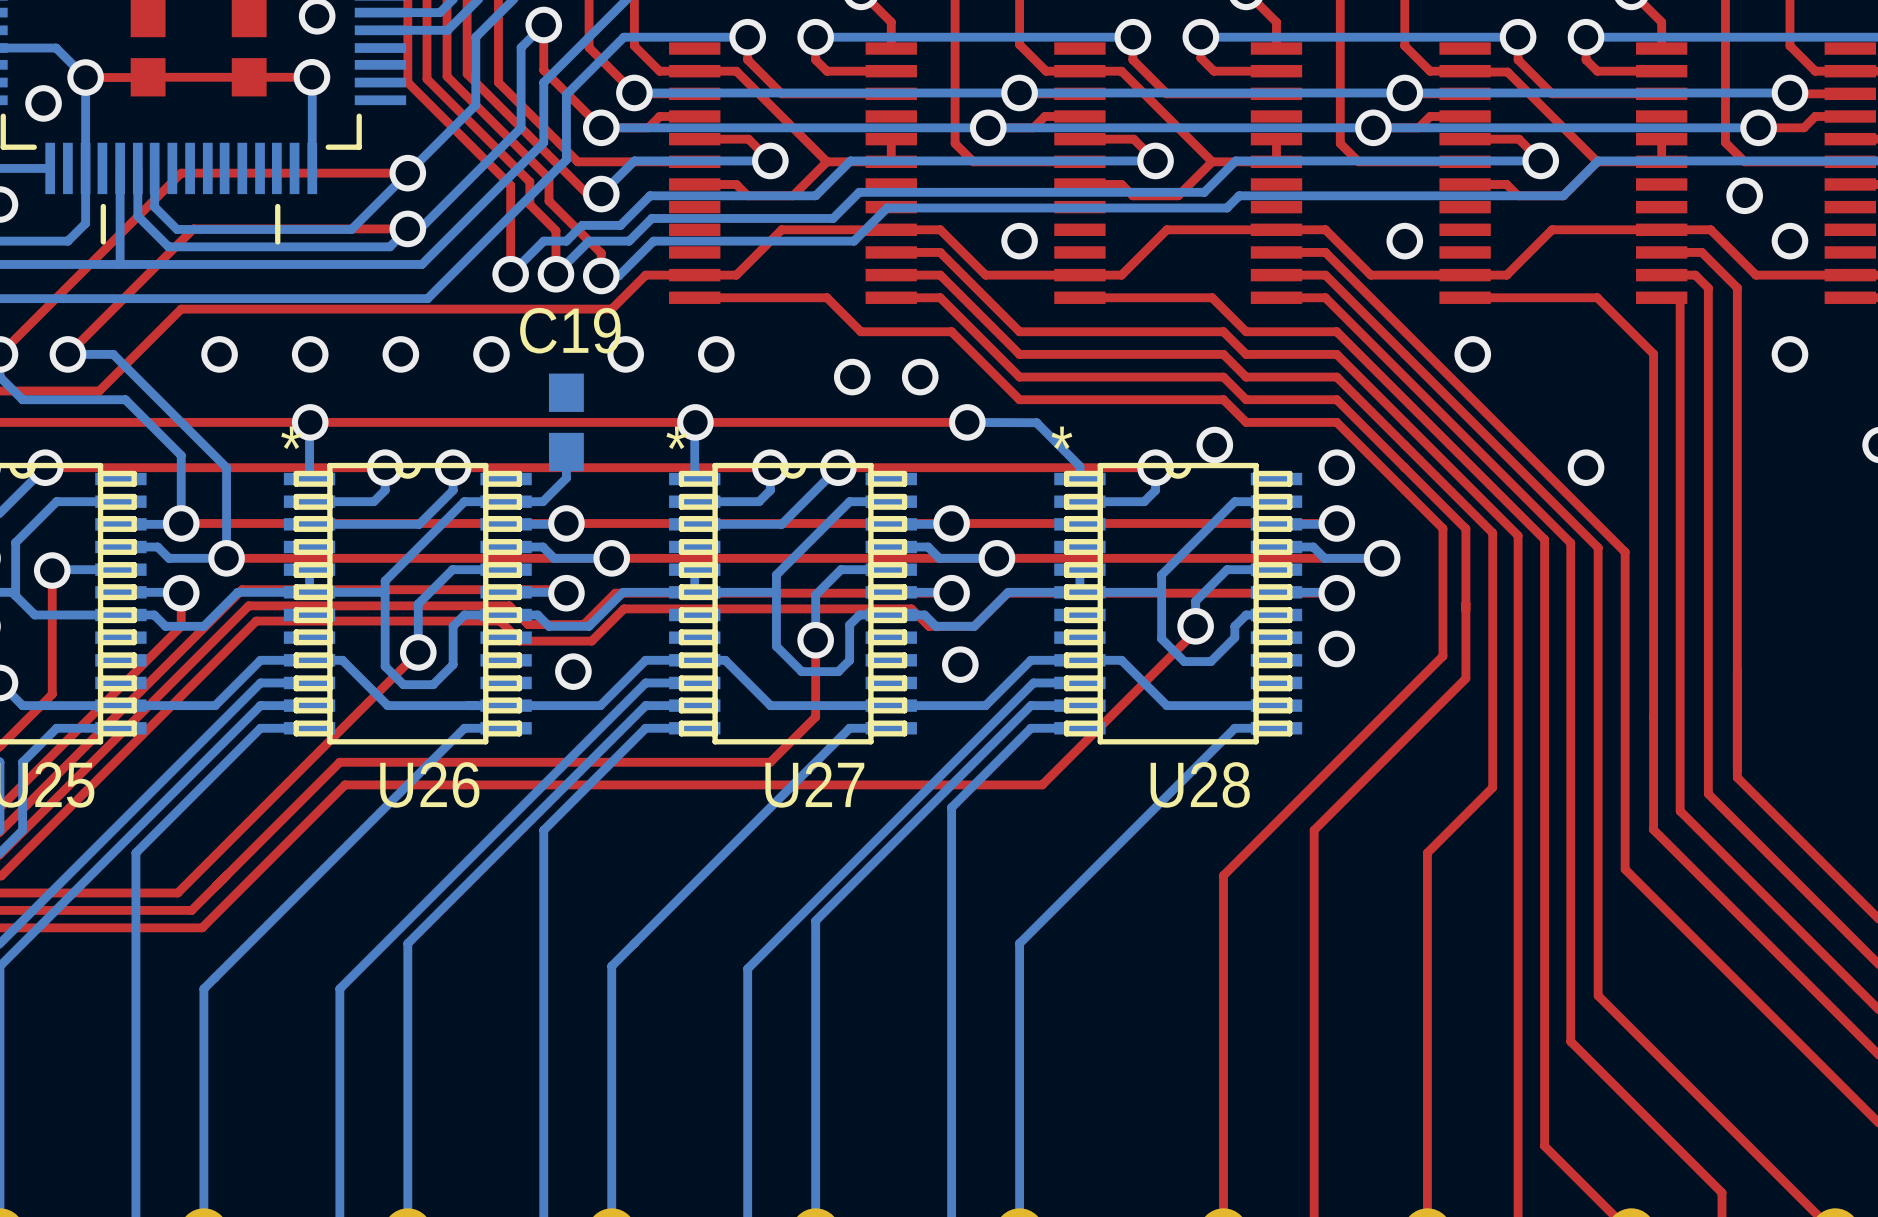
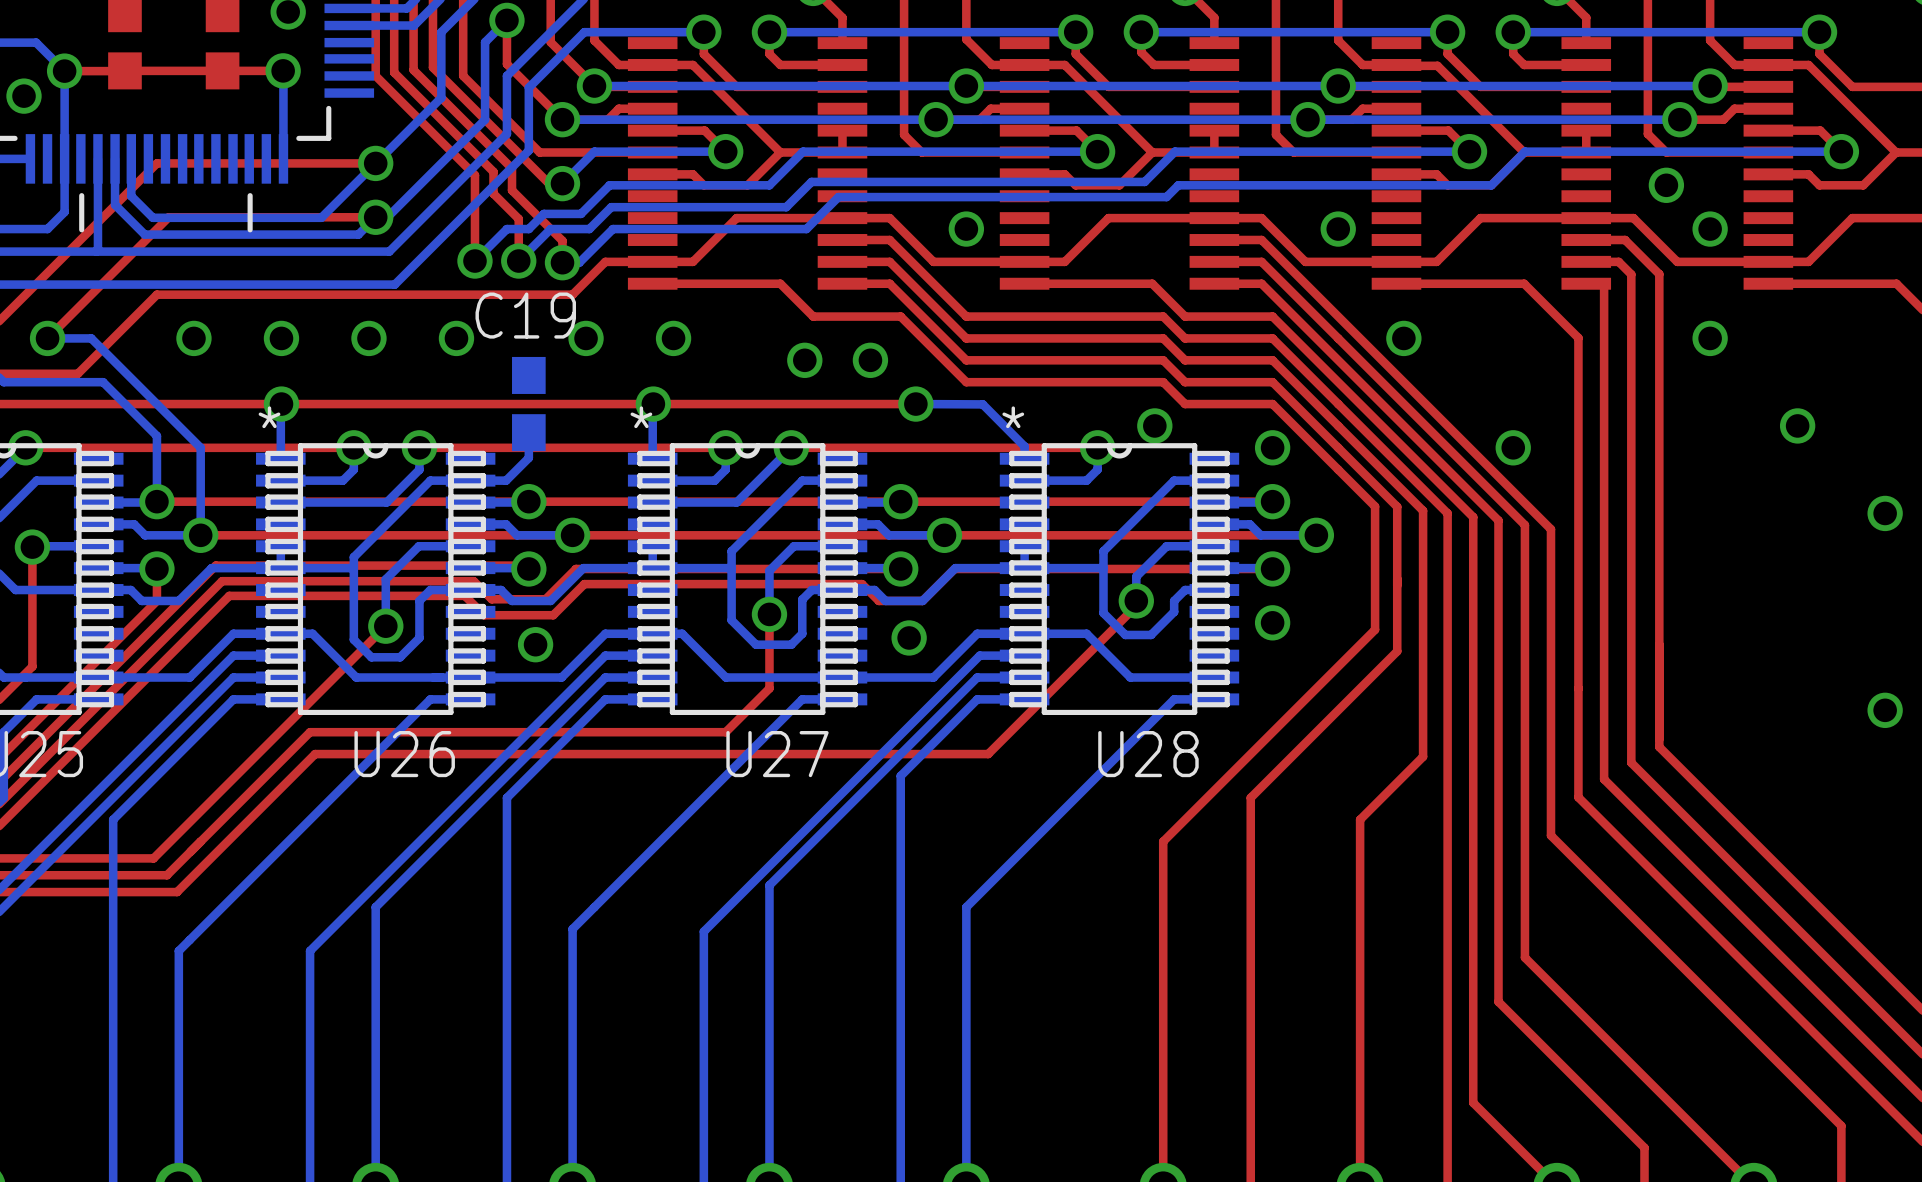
bottom track: (1121, 660) (1166, 705) (1189, 705) -> (1064, 633) (1086, 633) (1130, 677)

